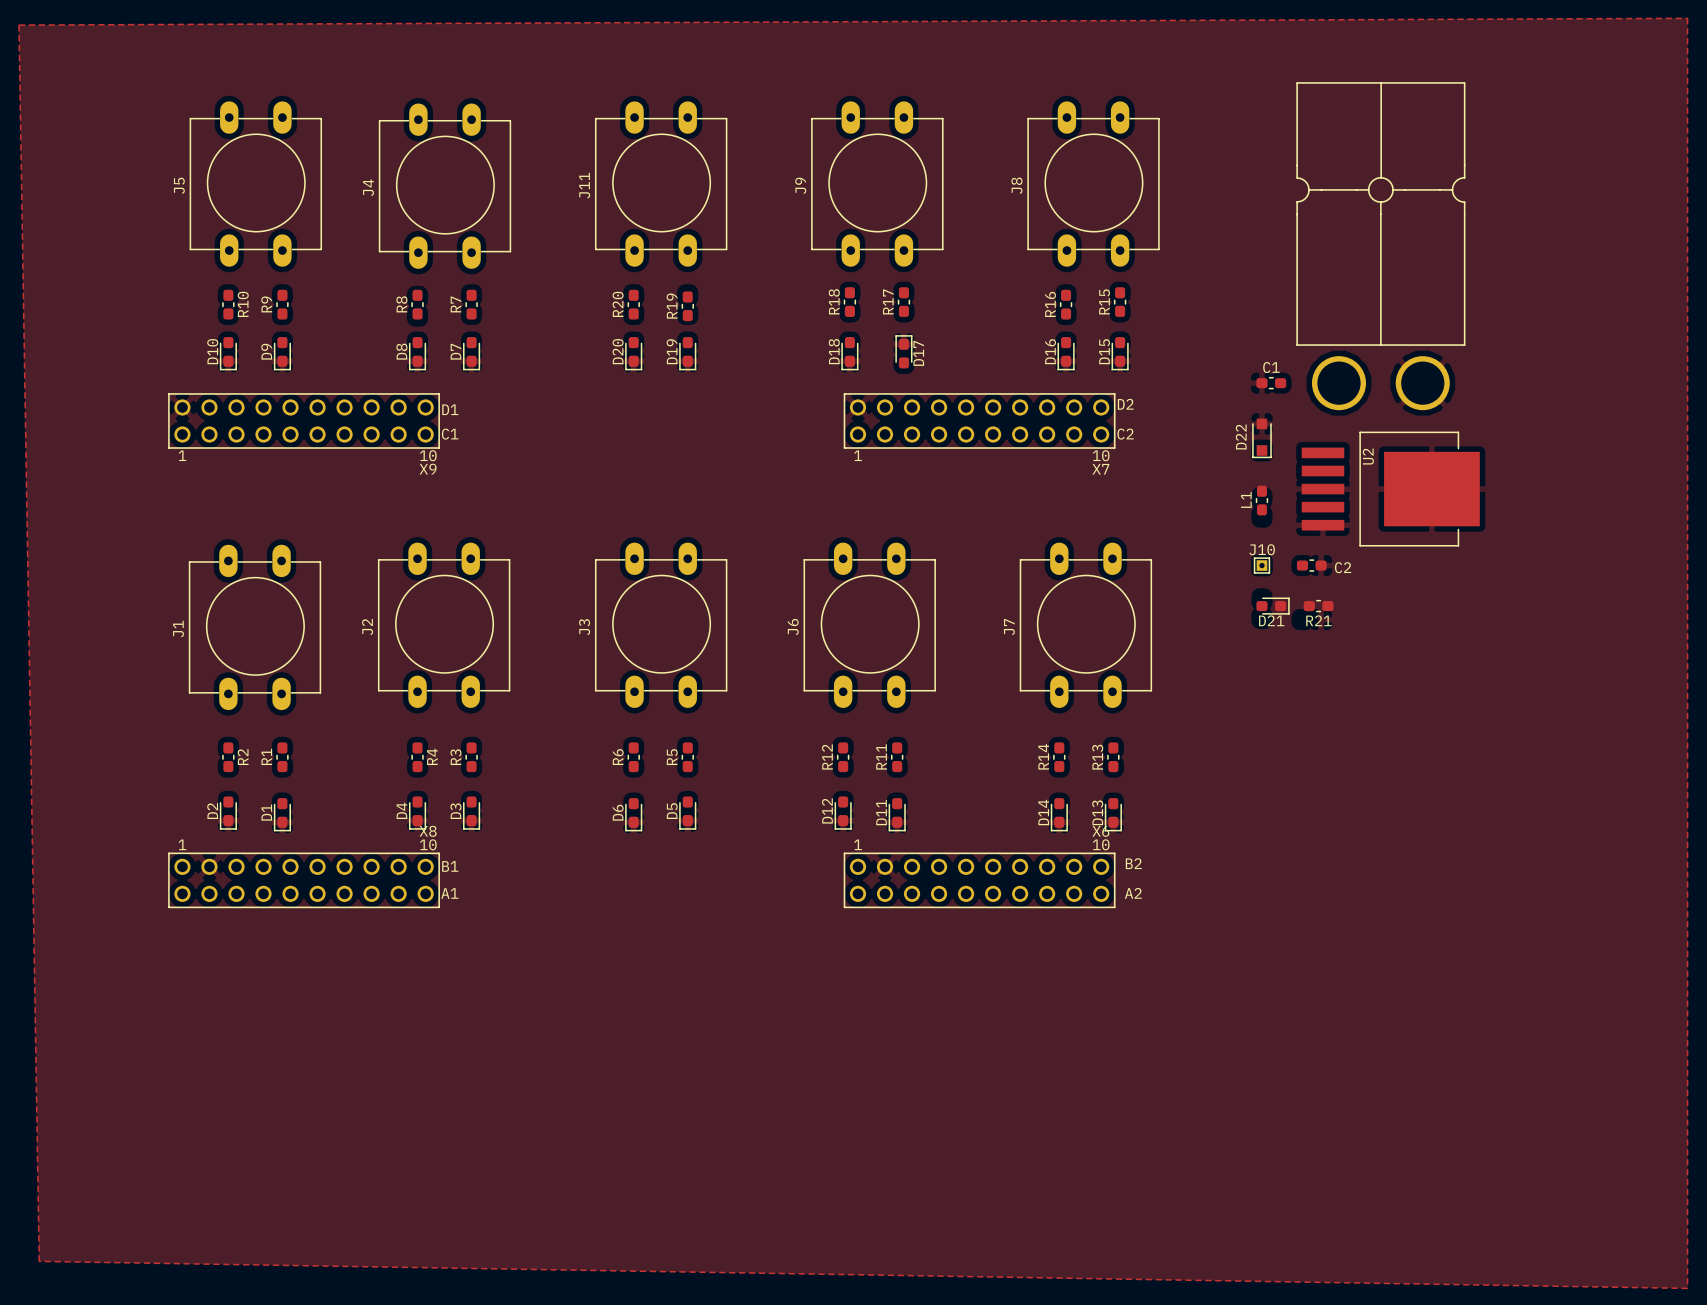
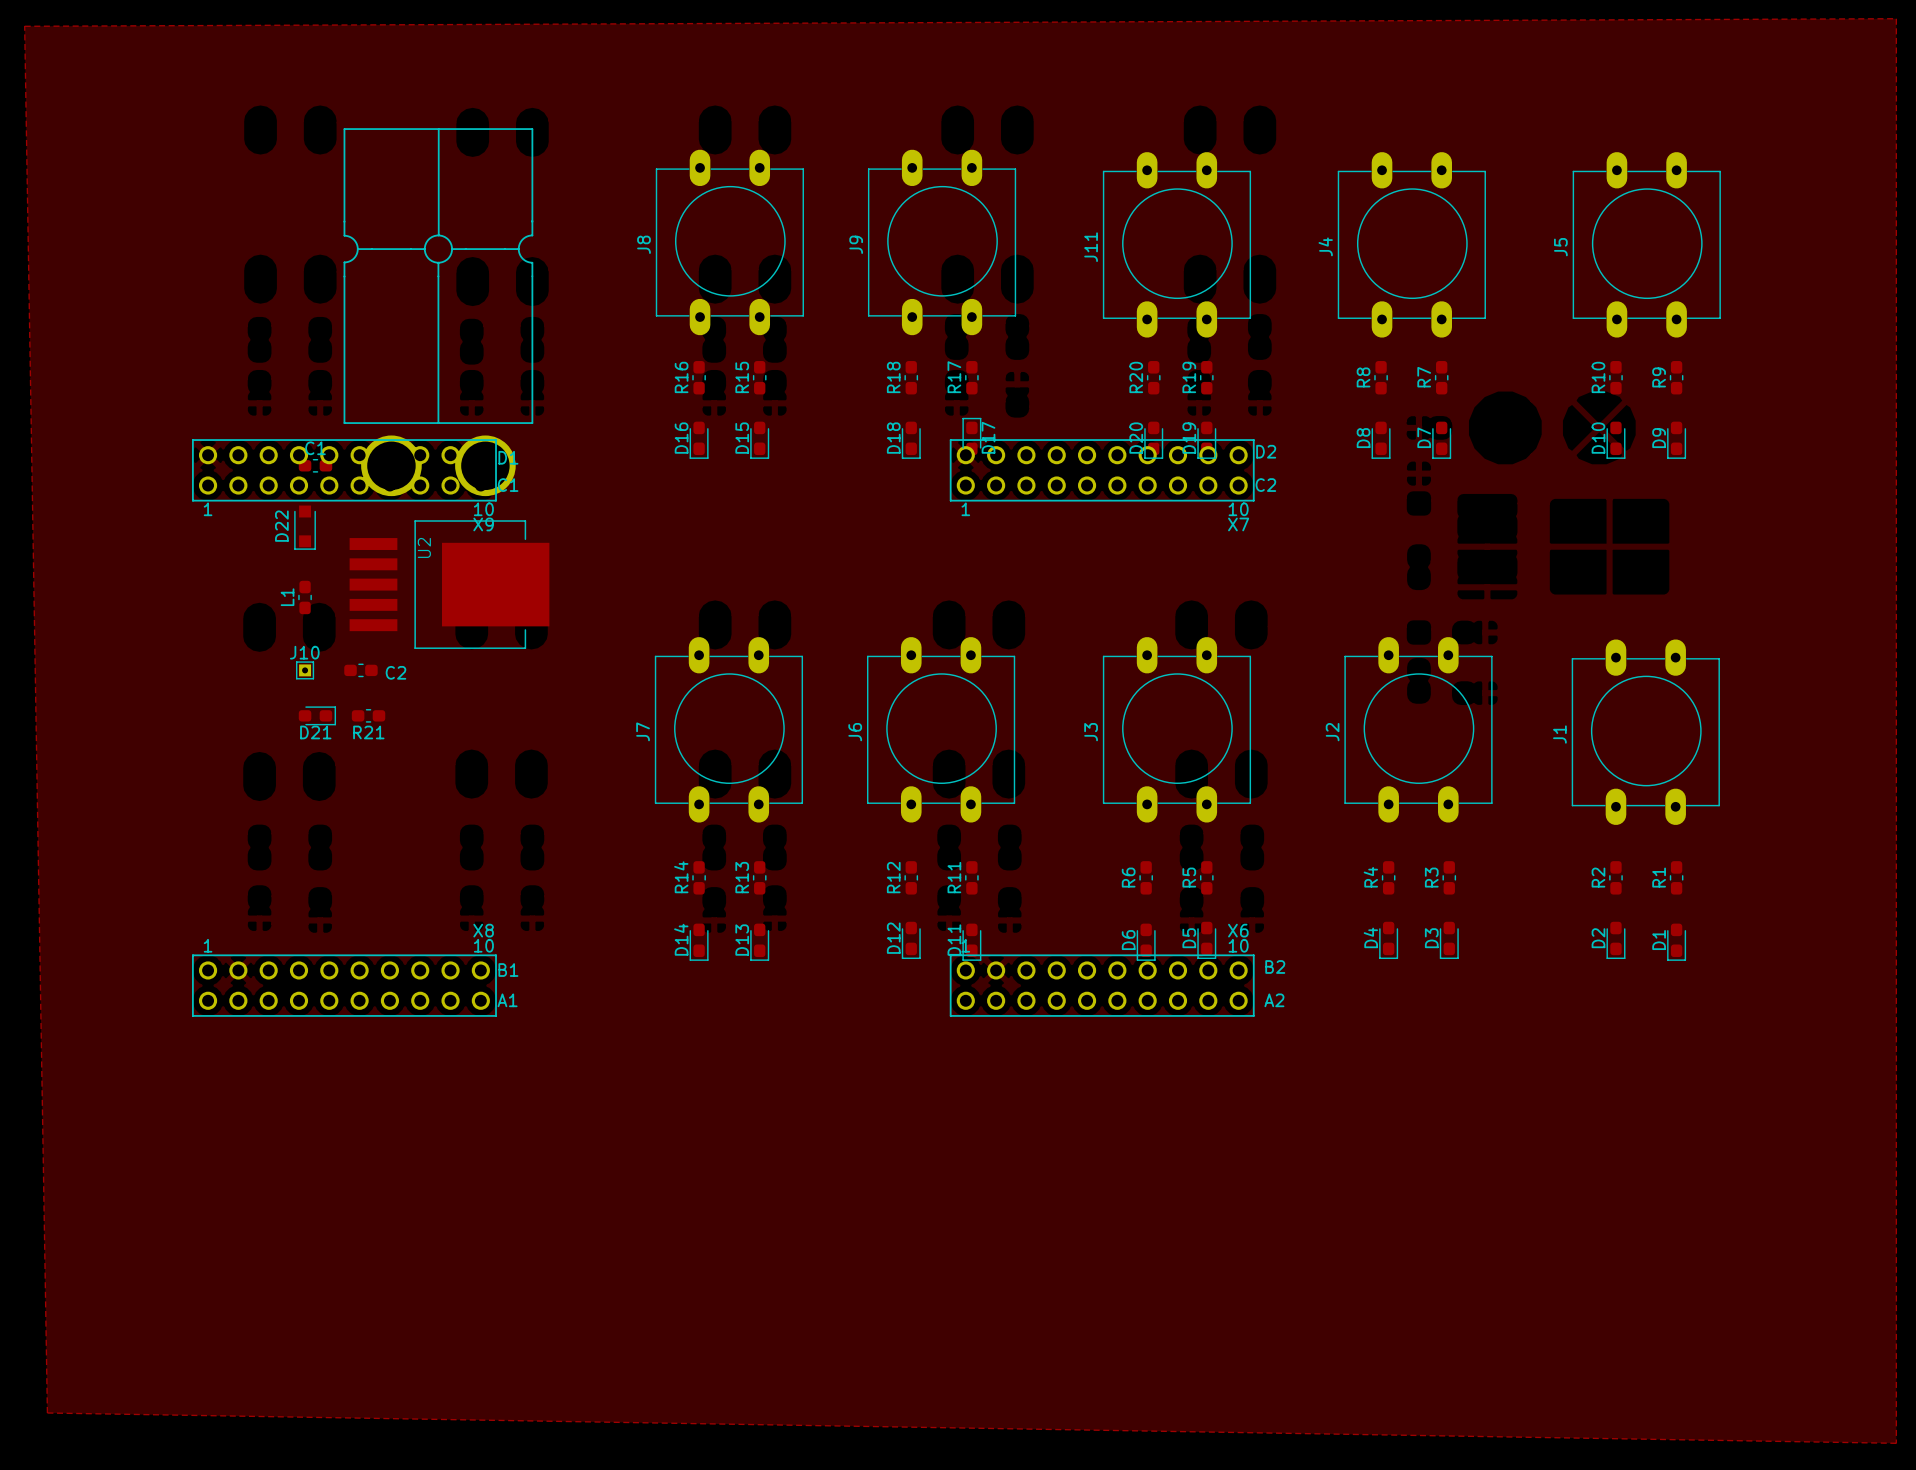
J5 position: (255, 184) -> (1646, 244)
J11 position: (661, 184) -> (1176, 244)
J9 position: (877, 184) -> (942, 242)
J8 position: (1093, 184) -> (729, 242)
J4 position: (444, 186) -> (1411, 244)
part: (1380, 246) -> none
part: none -> (438, 312)
R18 position: (849, 302) -> (911, 377)
R17 position: (903, 302) -> (971, 377)
R15 position: (1120, 302) -> (759, 377)
R10 position: (228, 304) -> (1615, 377)
R10 name position: R10 (243, 304) -> R10 (1598, 377)
R9 position: (282, 304) -> (1676, 377)
R8 position: (417, 304) -> (1381, 377)
R7 position: (471, 304) -> (1441, 377)
R20 position: (633, 304) -> (1153, 377)
R16 position: (1066, 304) -> (699, 377)
R19 position: (687, 306) -> (1206, 377)
D17 position: (903, 351) -> (971, 436)
D10 position: (228, 353) -> (1615, 440)
D9 position: (282, 353) -> (1676, 440)
D8 position: (417, 353) -> (1381, 440)
D7 position: (471, 353) -> (1441, 440)
D20 position: (633, 353) -> (1153, 440)
D19 position: (687, 353) -> (1206, 440)
D18 position: (849, 353) -> (911, 440)
D16 position: (1066, 353) -> (699, 440)
D15 position: (1120, 353) -> (759, 440)
C1 position: (1271, 383) -> (315, 465)
D22 position: (1261, 438) -> (305, 527)
U2 position: (1390, 489) -> (449, 584)
L1 position: (1261, 500) -> (305, 597)
J10 position: (1261, 565) -> (305, 670)
C2 position: (1311, 565) -> (360, 670)
D21 position: (1272, 606) -> (317, 715)
R21 position: (1318, 606) -> (368, 715)
J2 position: (444, 625) -> (1418, 729)
J3 position: (661, 625) -> (1176, 729)
J6 position: (869, 625) -> (941, 729)
J7 position: (1085, 625) -> (728, 729)
J1 position: (254, 627) -> (1645, 732)
R4 name position: R4 (432, 756) -> R4 (1370, 877)
R2 position: (228, 757) -> (1615, 877)
R2 name position: R2 (243, 757) -> R2 (1598, 877)
R1 position: (282, 757) -> (1676, 877)
R4 position: (417, 757) -> (1388, 877)
R3 position: (471, 757) -> (1449, 877)
R6 position: (633, 757) -> (1146, 877)
R5 position: (687, 757) -> (1206, 877)
R12 position: (843, 757) -> (911, 877)
R11 position: (897, 757) -> (971, 877)
R14 position: (1059, 757) -> (699, 877)
R13 position: (1113, 757) -> (759, 877)
D2 position: (228, 813) -> (1615, 940)
D4 position: (417, 813) -> (1388, 940)
D3 position: (471, 813) -> (1449, 940)
D5 position: (687, 813) -> (1206, 940)
D12 position: (843, 813) -> (911, 940)
D1 position: (282, 814) -> (1676, 942)
D6 position: (633, 814) -> (1146, 942)
D11 position: (897, 814) -> (971, 942)
D14 position: (1059, 814) -> (699, 942)
D13 position: (1113, 814) -> (759, 942)

